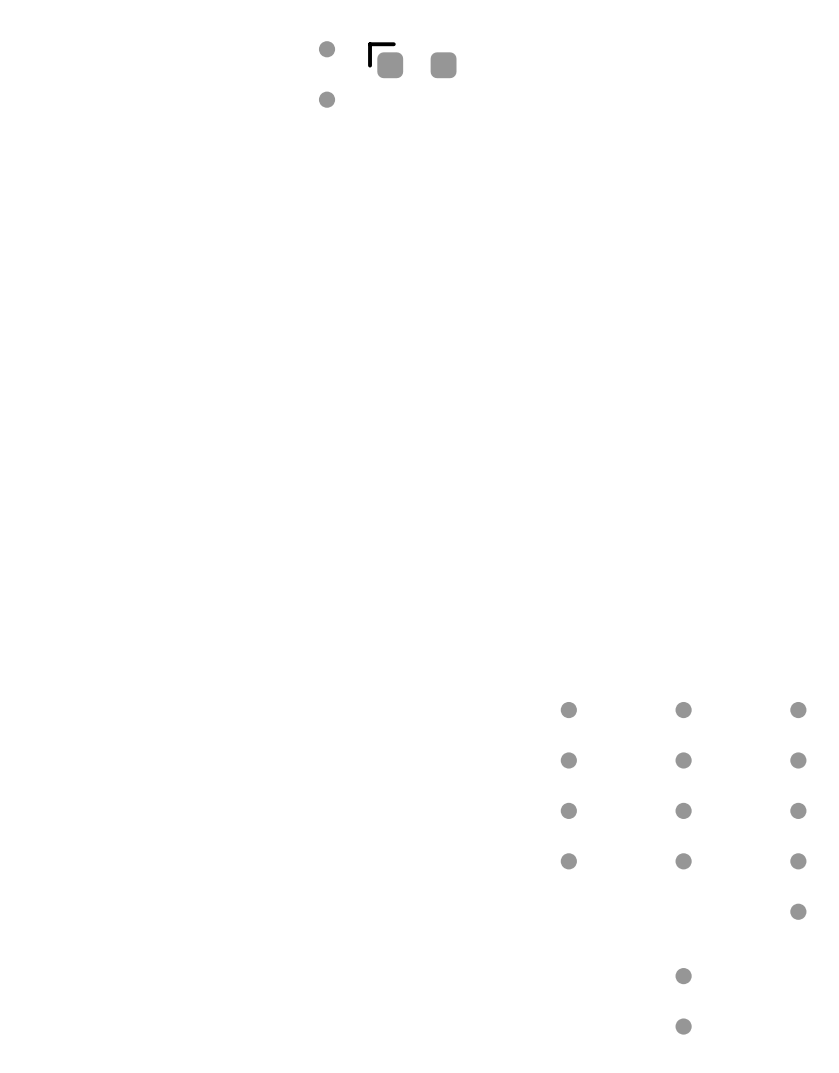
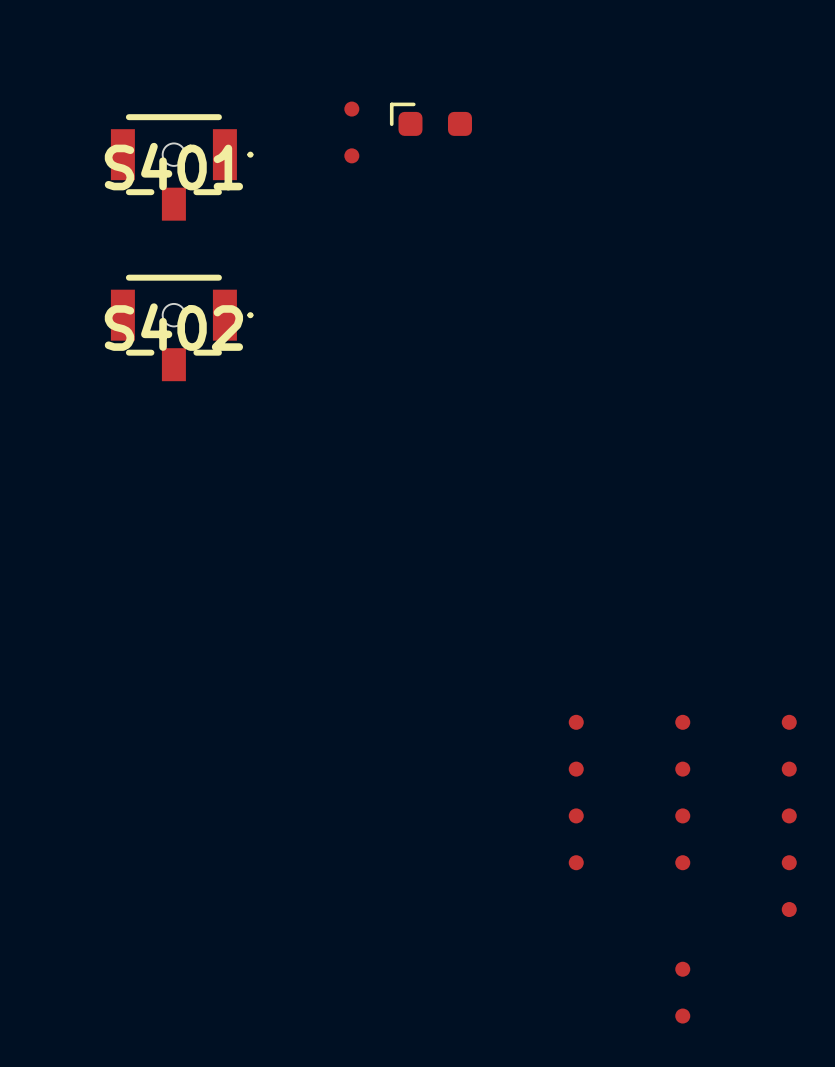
S401: none -> (182, 167)
S402: none -> (182, 327)

